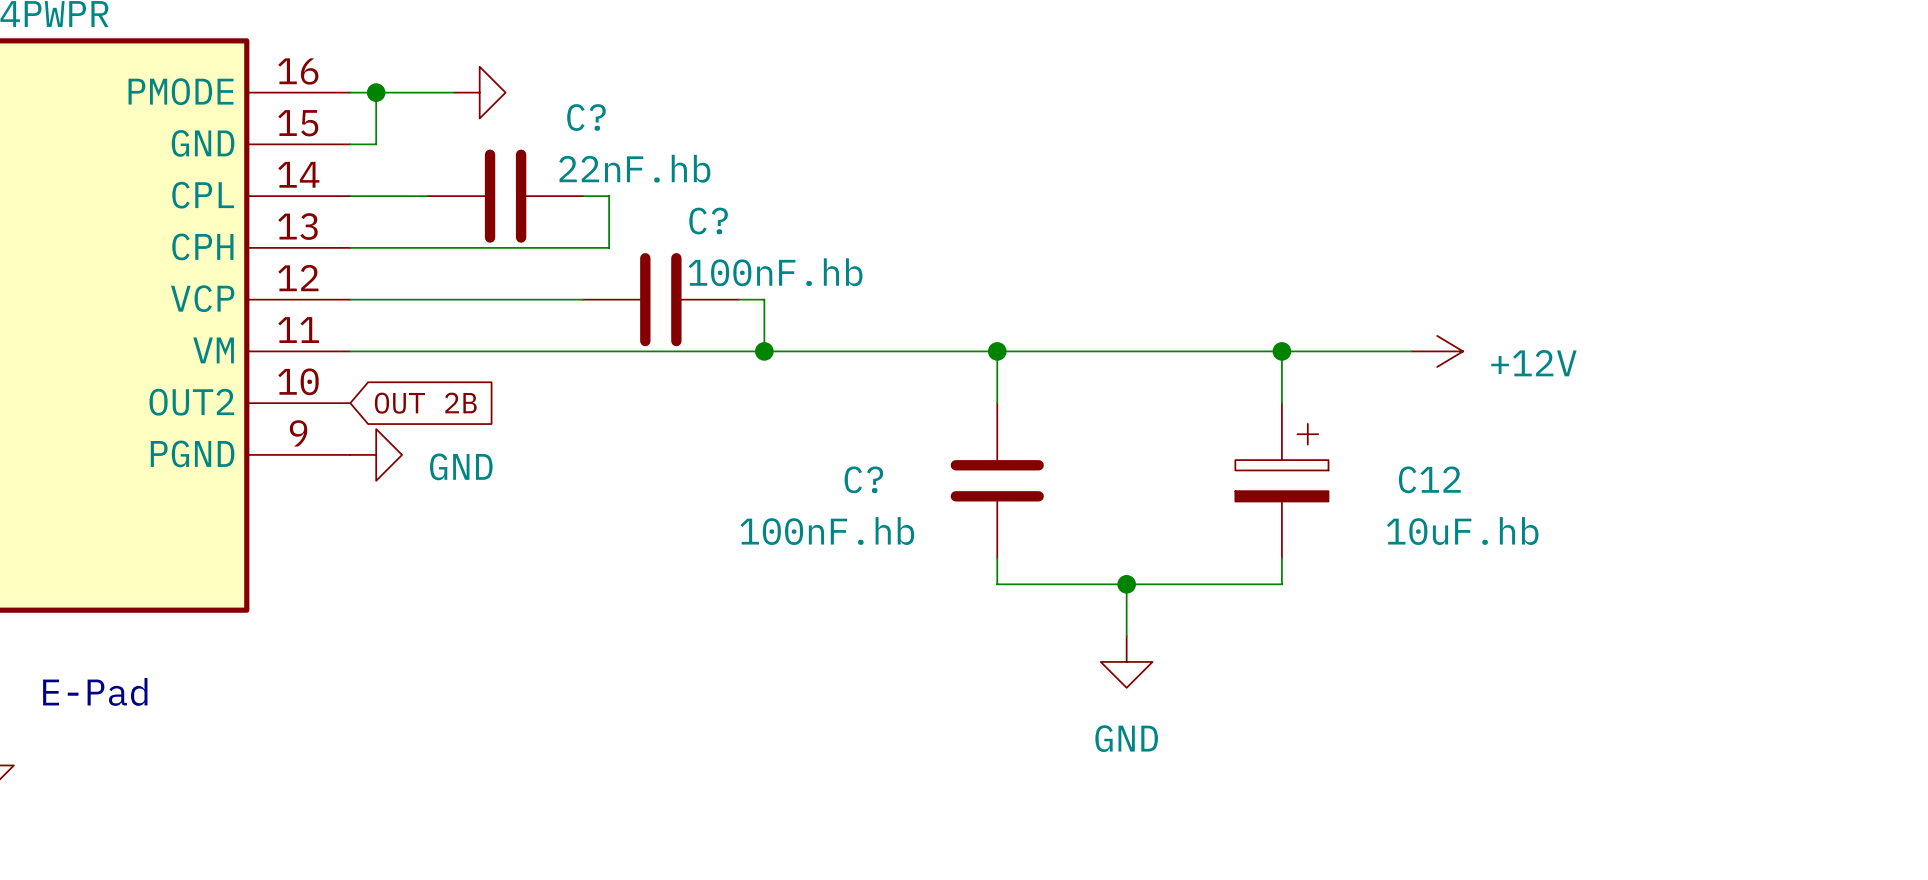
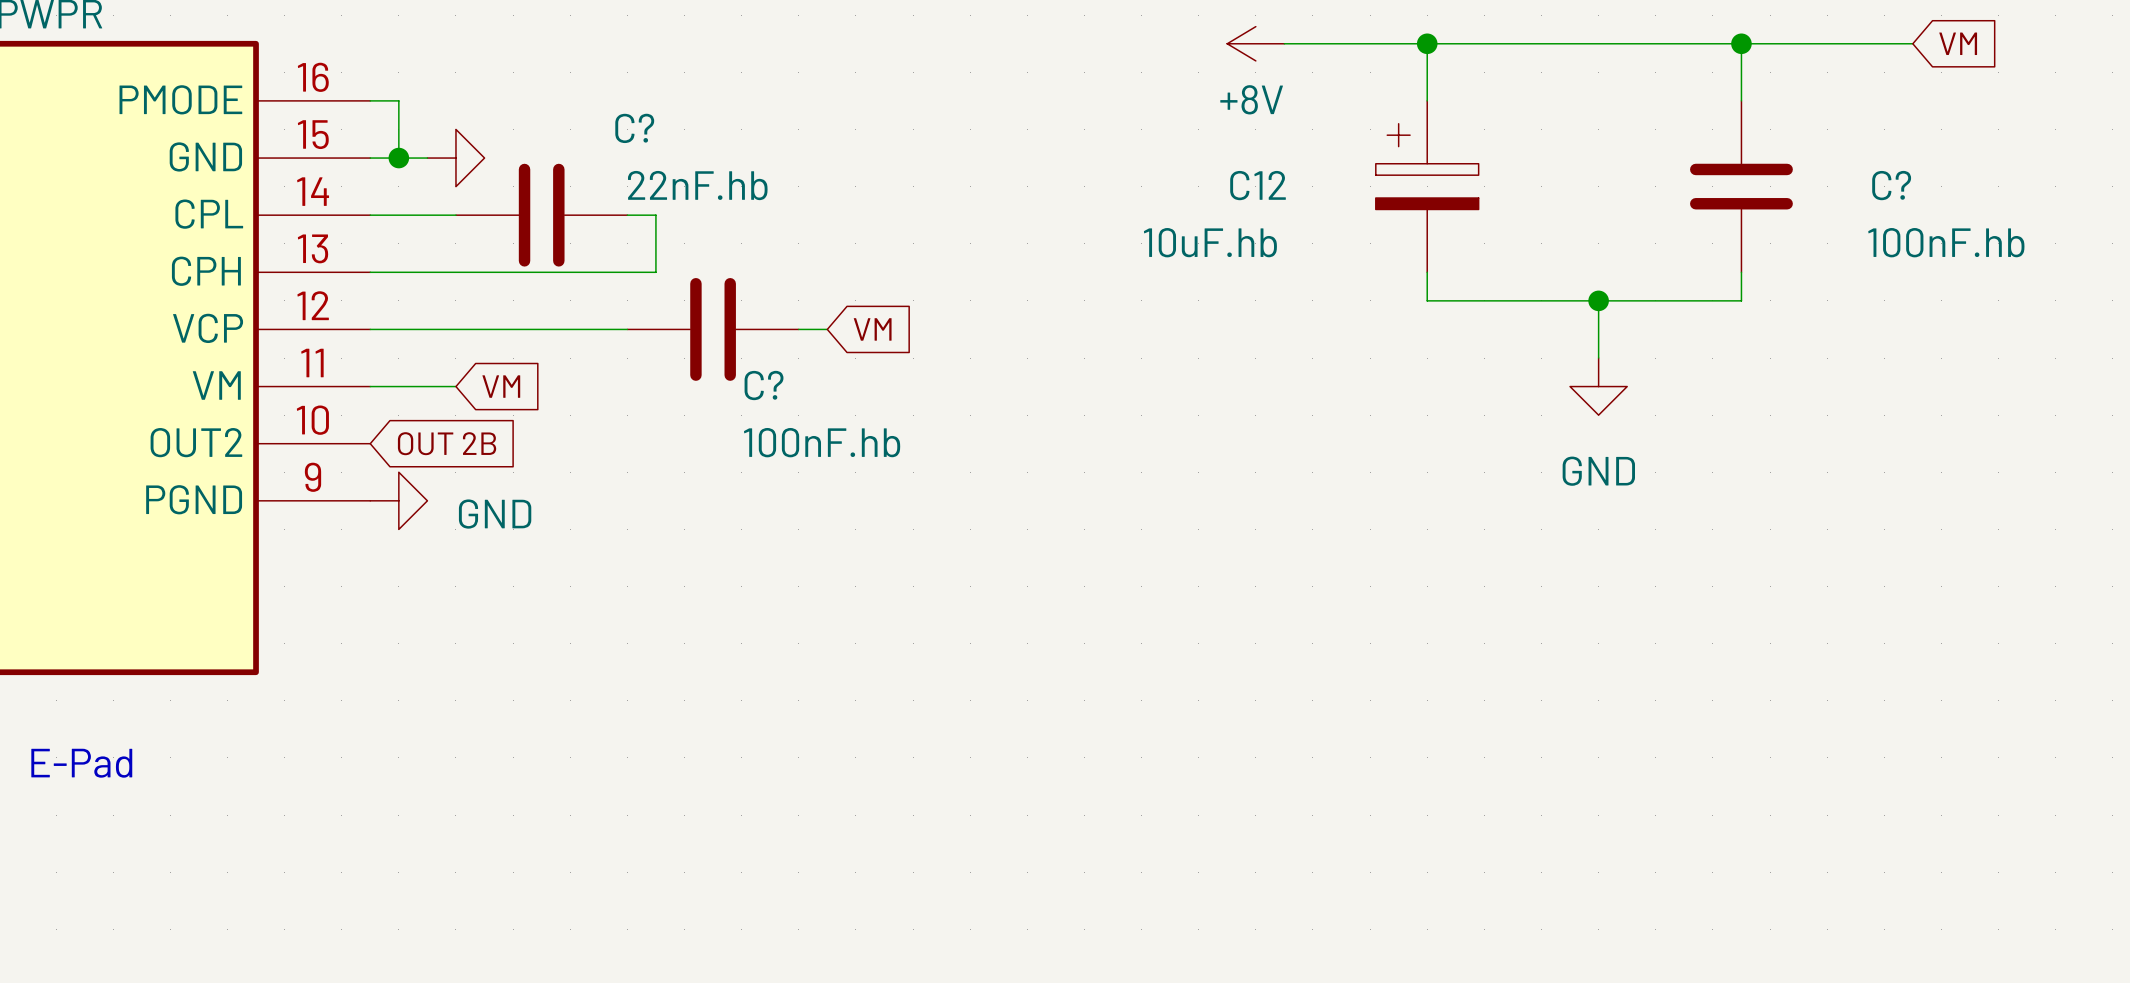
power symbol: none -> +8V (1255, 43)
wire: none -> (1284, 43) (1912, 43)
junction: none -> (1427, 43)
junction: none -> (1741, 43)
global label: none -> VM (1958, 43)
wire: (376, 92) (453, 92) -> none
junction position: (376, 92) -> (398, 158)
power symbol position: (479, 92) -> (455, 158)
wire: none -> (398, 158) (427, 158)
C?: none -> 100nF.hb (1741, 186)
C? name position: C? (708, 221) -> C? (764, 385)
C? value position: 100nF.hb (775, 272) -> 100nF.hb (822, 442)
junction: none -> (1598, 300)
wire: (764, 299) (764, 351) -> none
global label: none -> VM (872, 329)
wire: (427, 351) (1411, 351) -> none
global label: none -> VM (501, 386)
junction: (764, 351) -> none
wire: (997, 351) (997, 403) -> (1427, 43) (1427, 100)
junction: (997, 351) -> none
wire: (1281, 351) (1281, 403) -> (1741, 43) (1741, 100)
junction: (1281, 351) -> none
power symbol: +12V (1437, 351) -> none
C12 flip: as is (1281, 462) -> left-right (1427, 166)
C?: 100nF.hb (997, 480) -> none
C12 position: (1281, 480) -> (1427, 186)
wire: (997, 558) (997, 584) (1281, 584) (1281, 558) -> (1427, 272) (1427, 300) (1741, 300) (1741, 272)
wire: (1126, 584) (1126, 636) -> (1598, 300) (1598, 358)
junction: (1126, 584) -> none
power symbol position: GND (1126, 661) -> GND (1598, 386)

